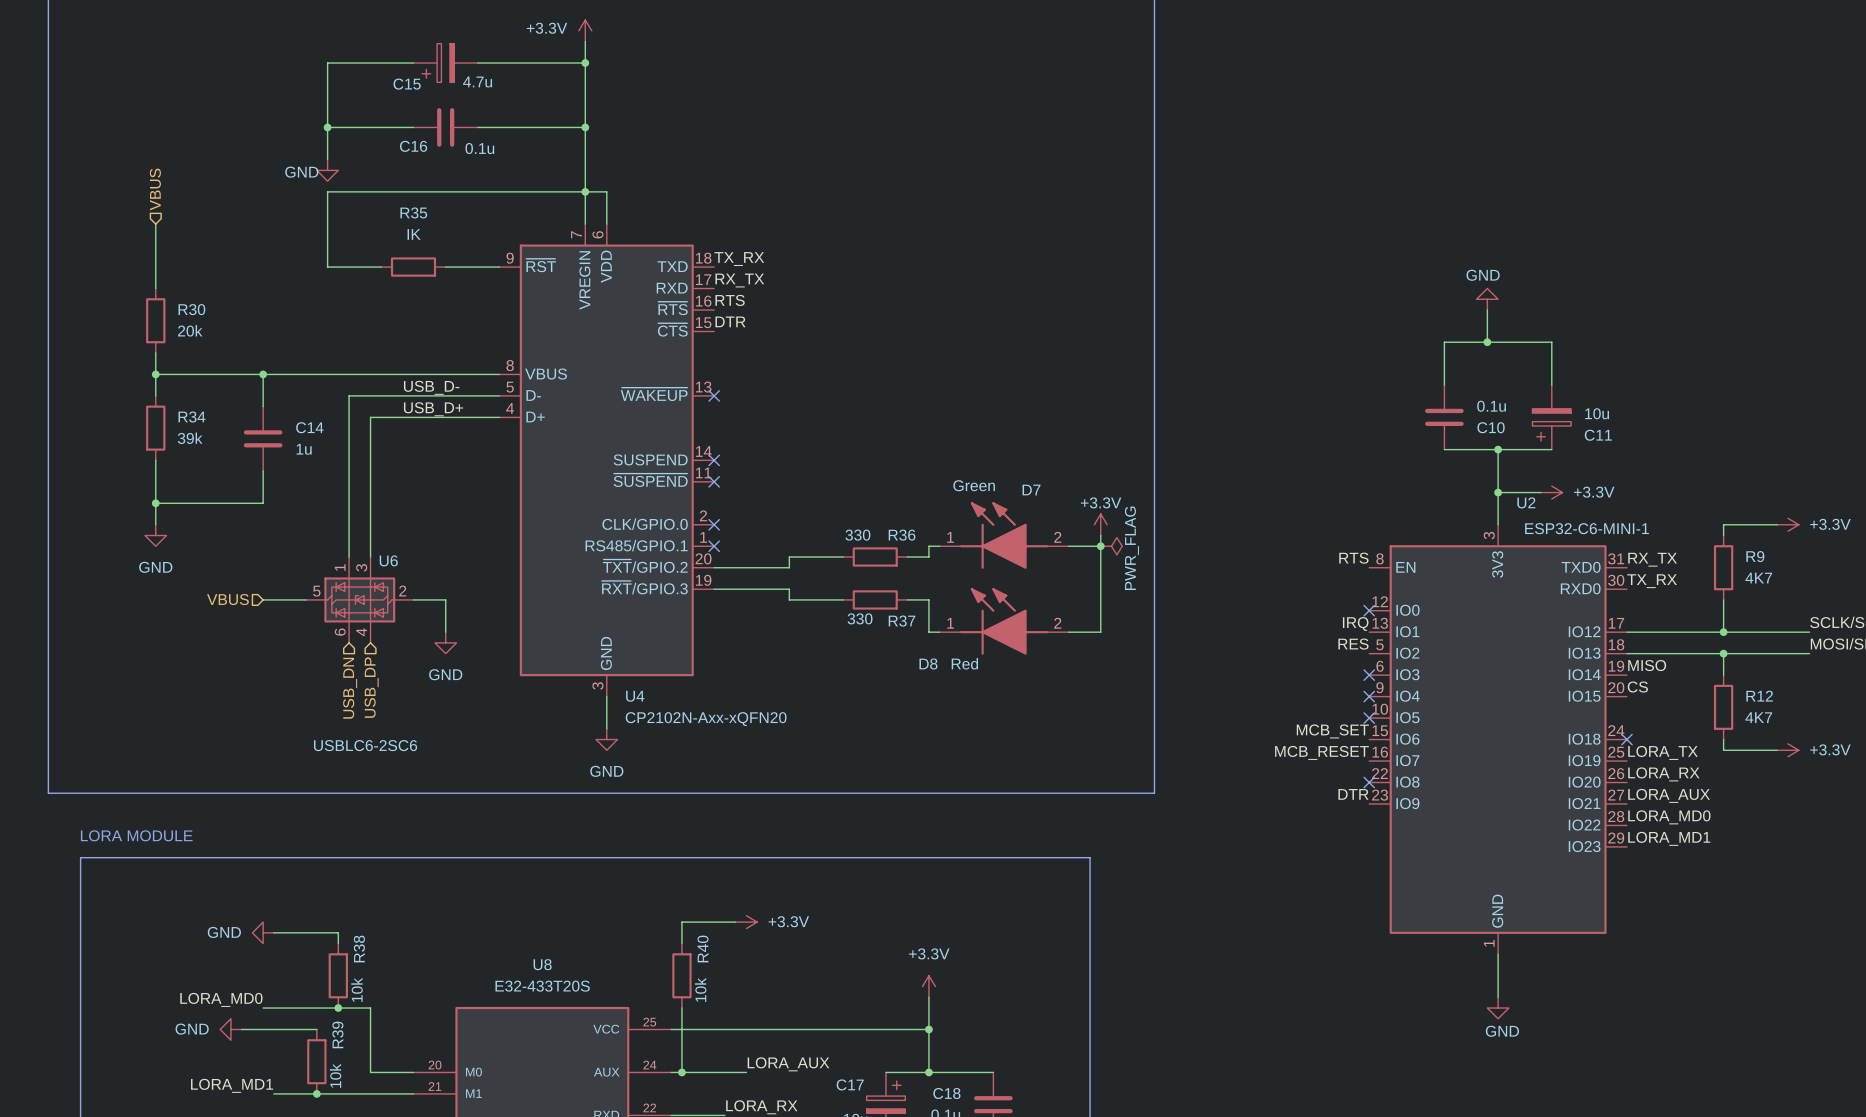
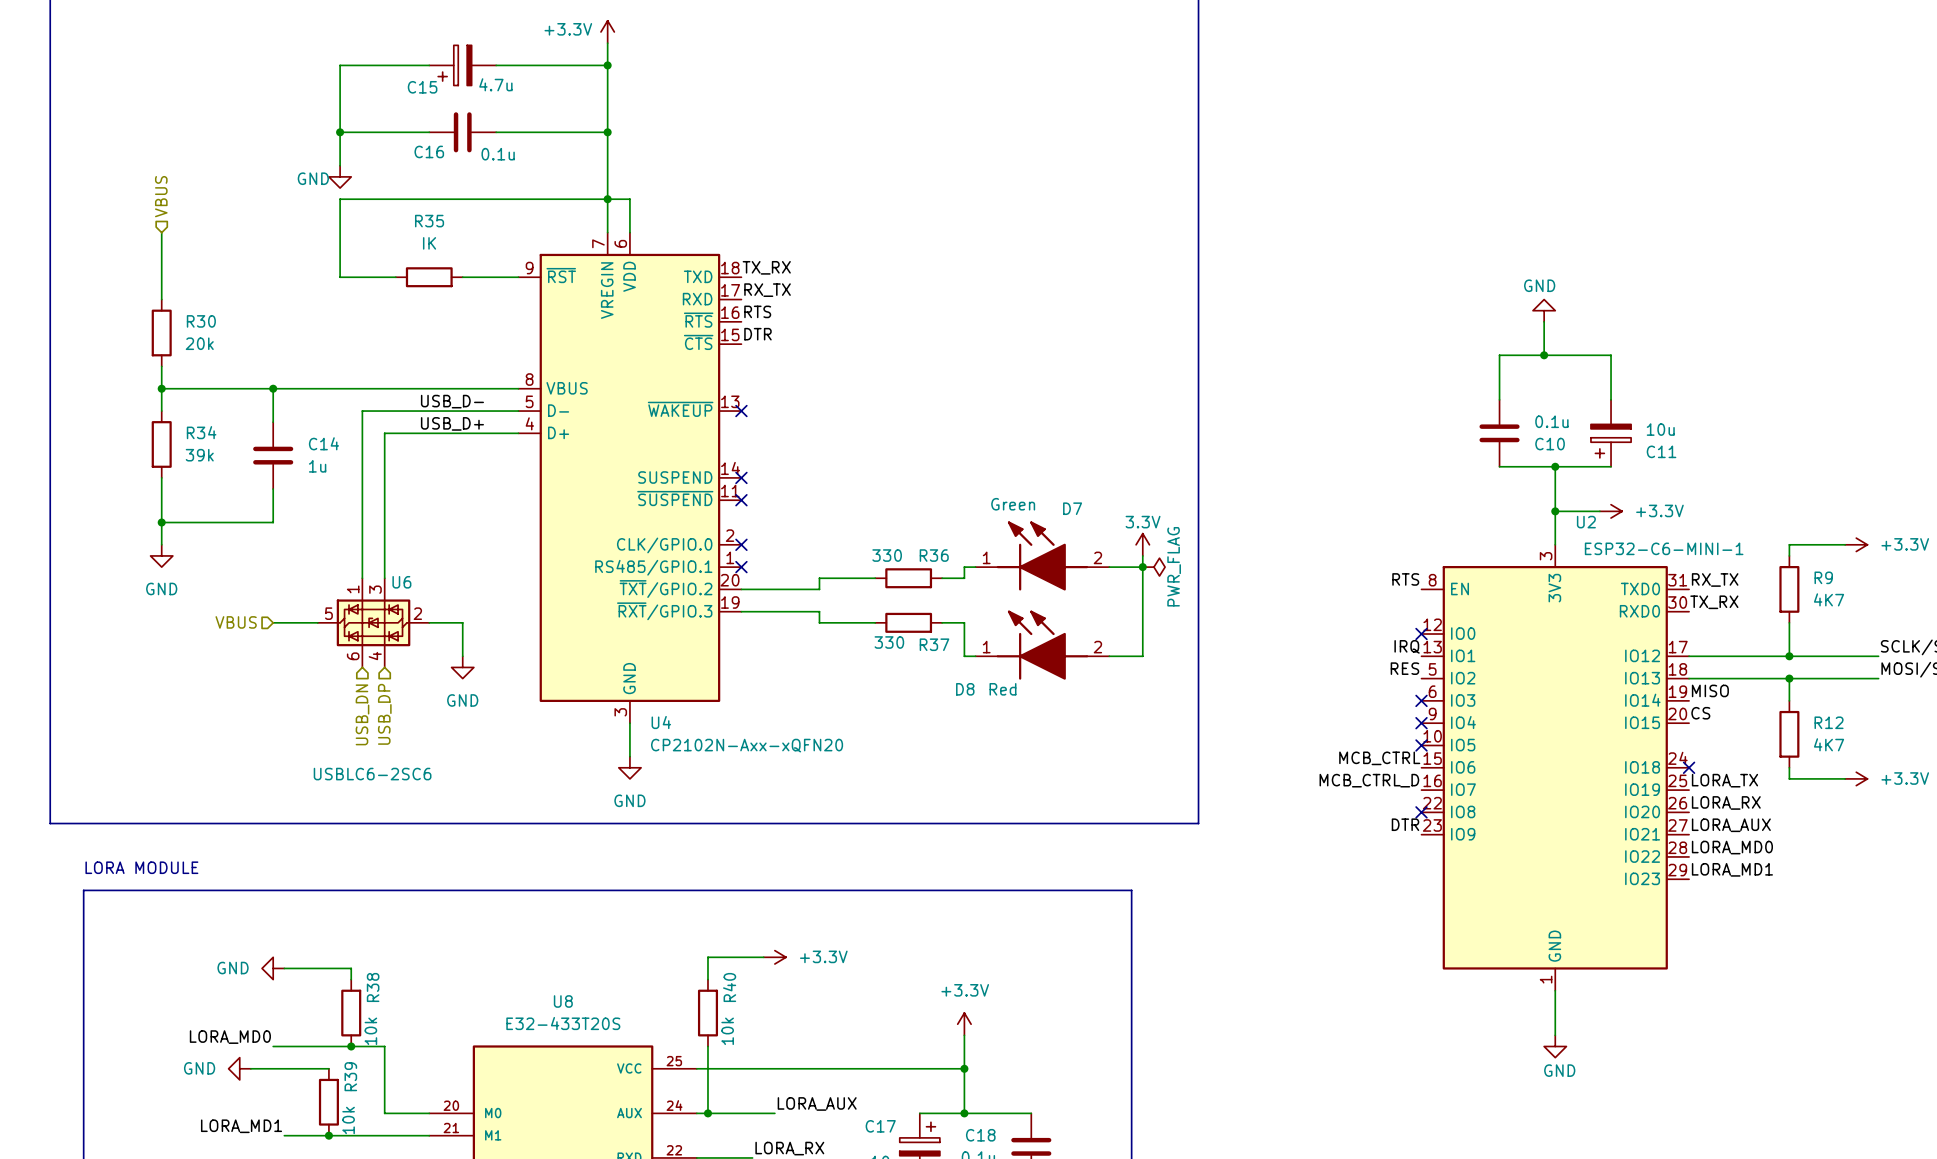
power symbol: +3.3V (1100, 524) -> 3.3V (1142, 544)
label: MCB_SET (1332, 731) -> MCB_CTRL (1379, 758)
label: MCB_RESET (1321, 752) -> MCB_CTRL_D (1369, 780)

